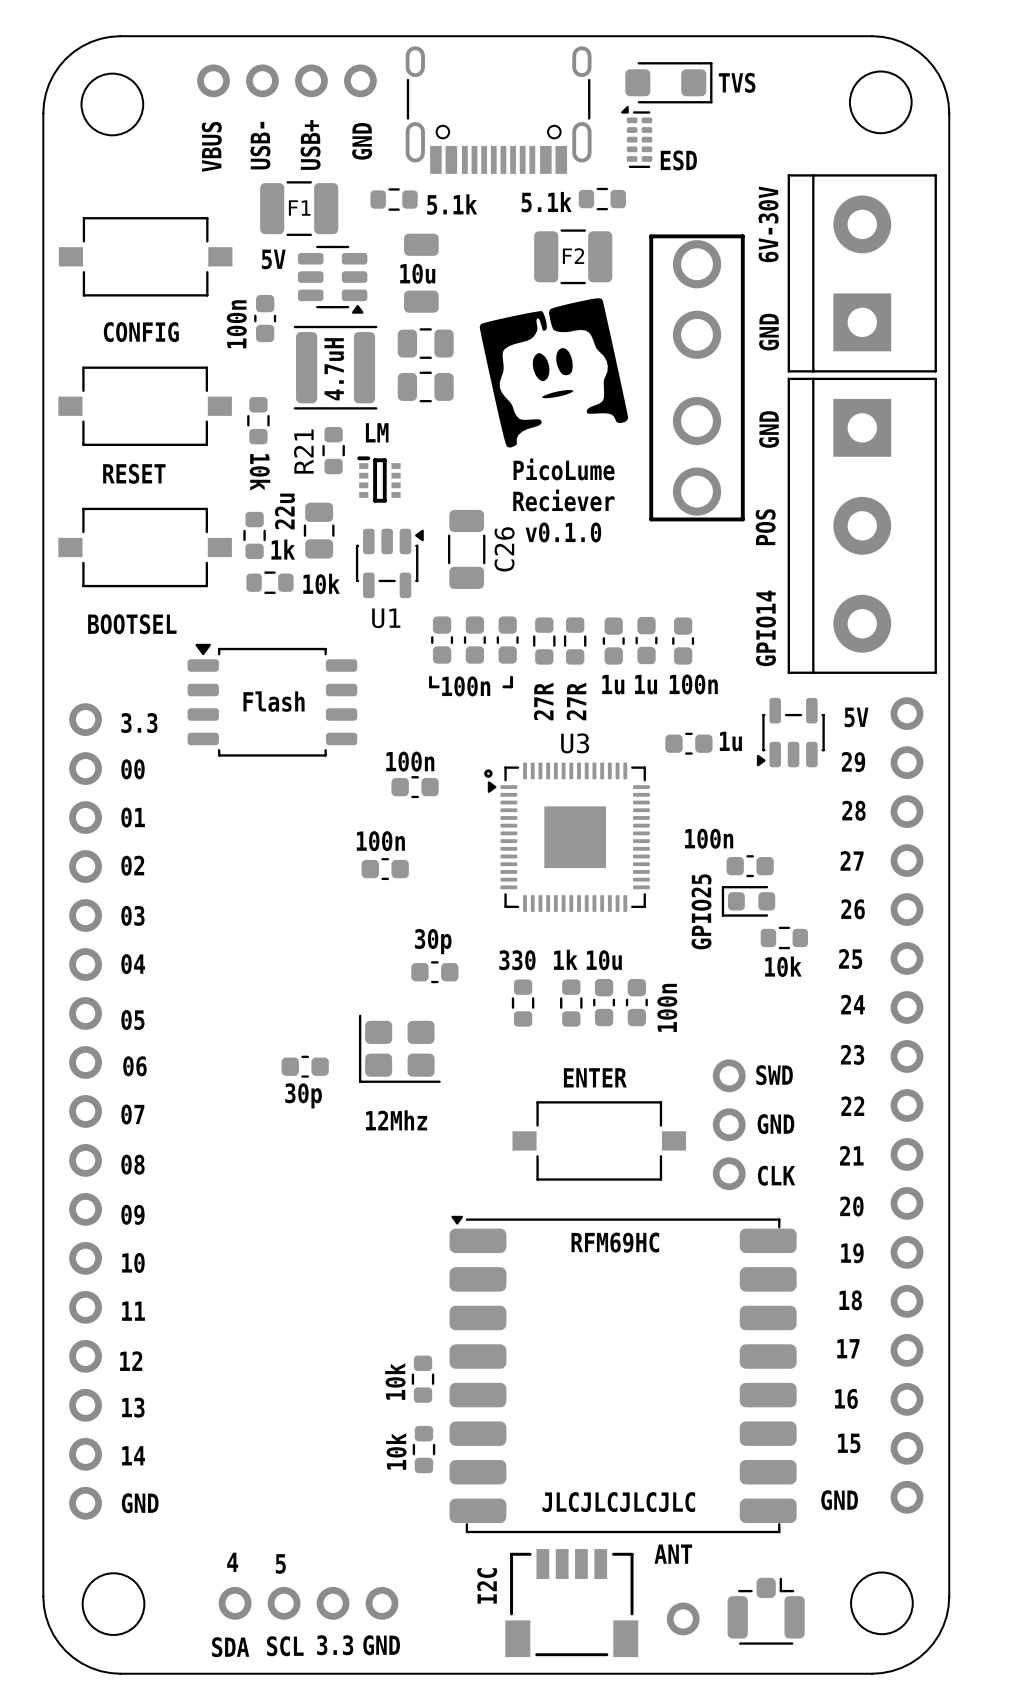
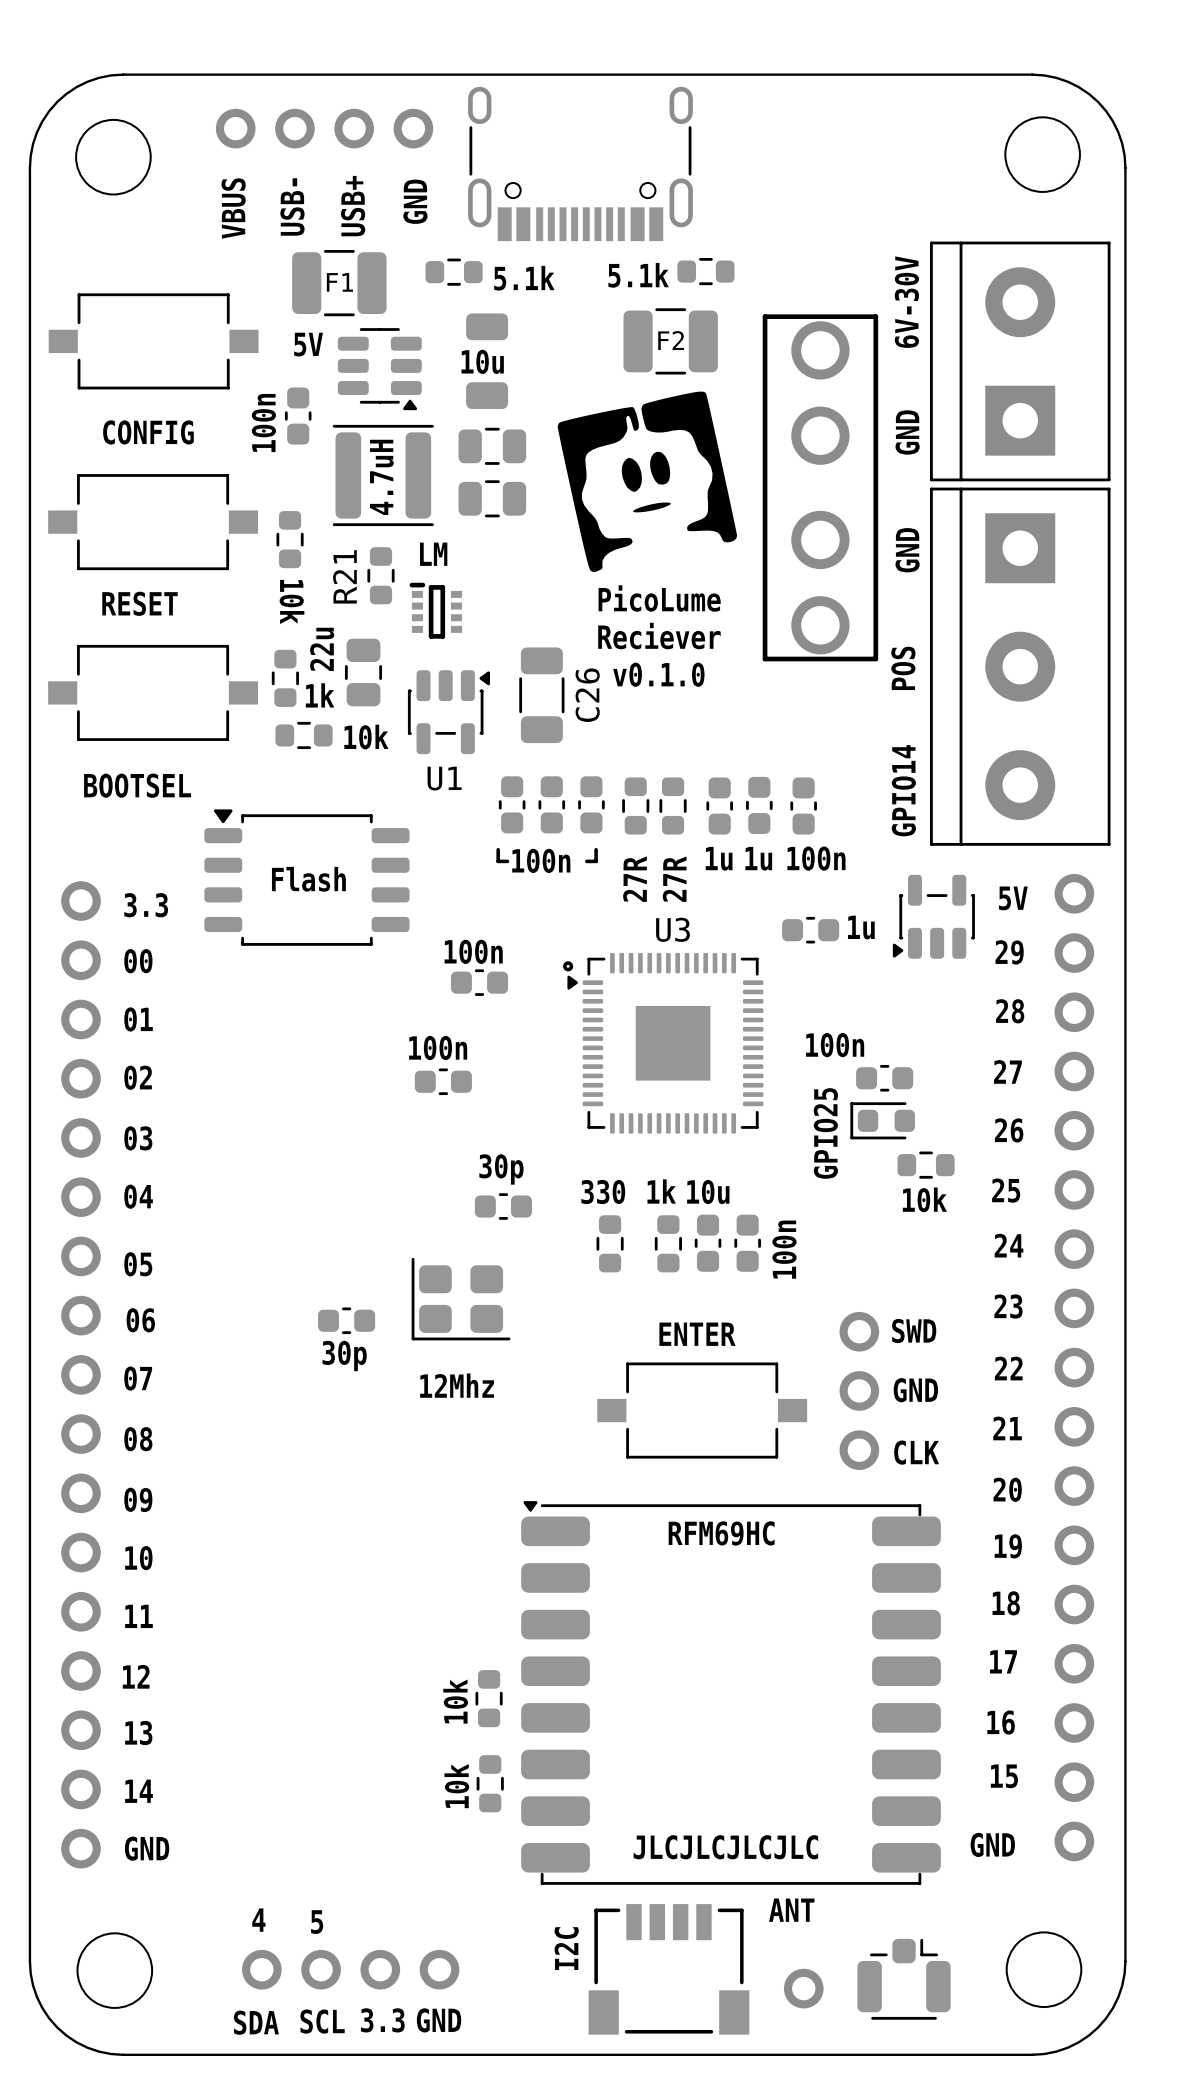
part: (668, 82) -> none
text: TVS (737, 82) -> none
part: (636, 136) -> none
text: ESD (678, 160) -> none

